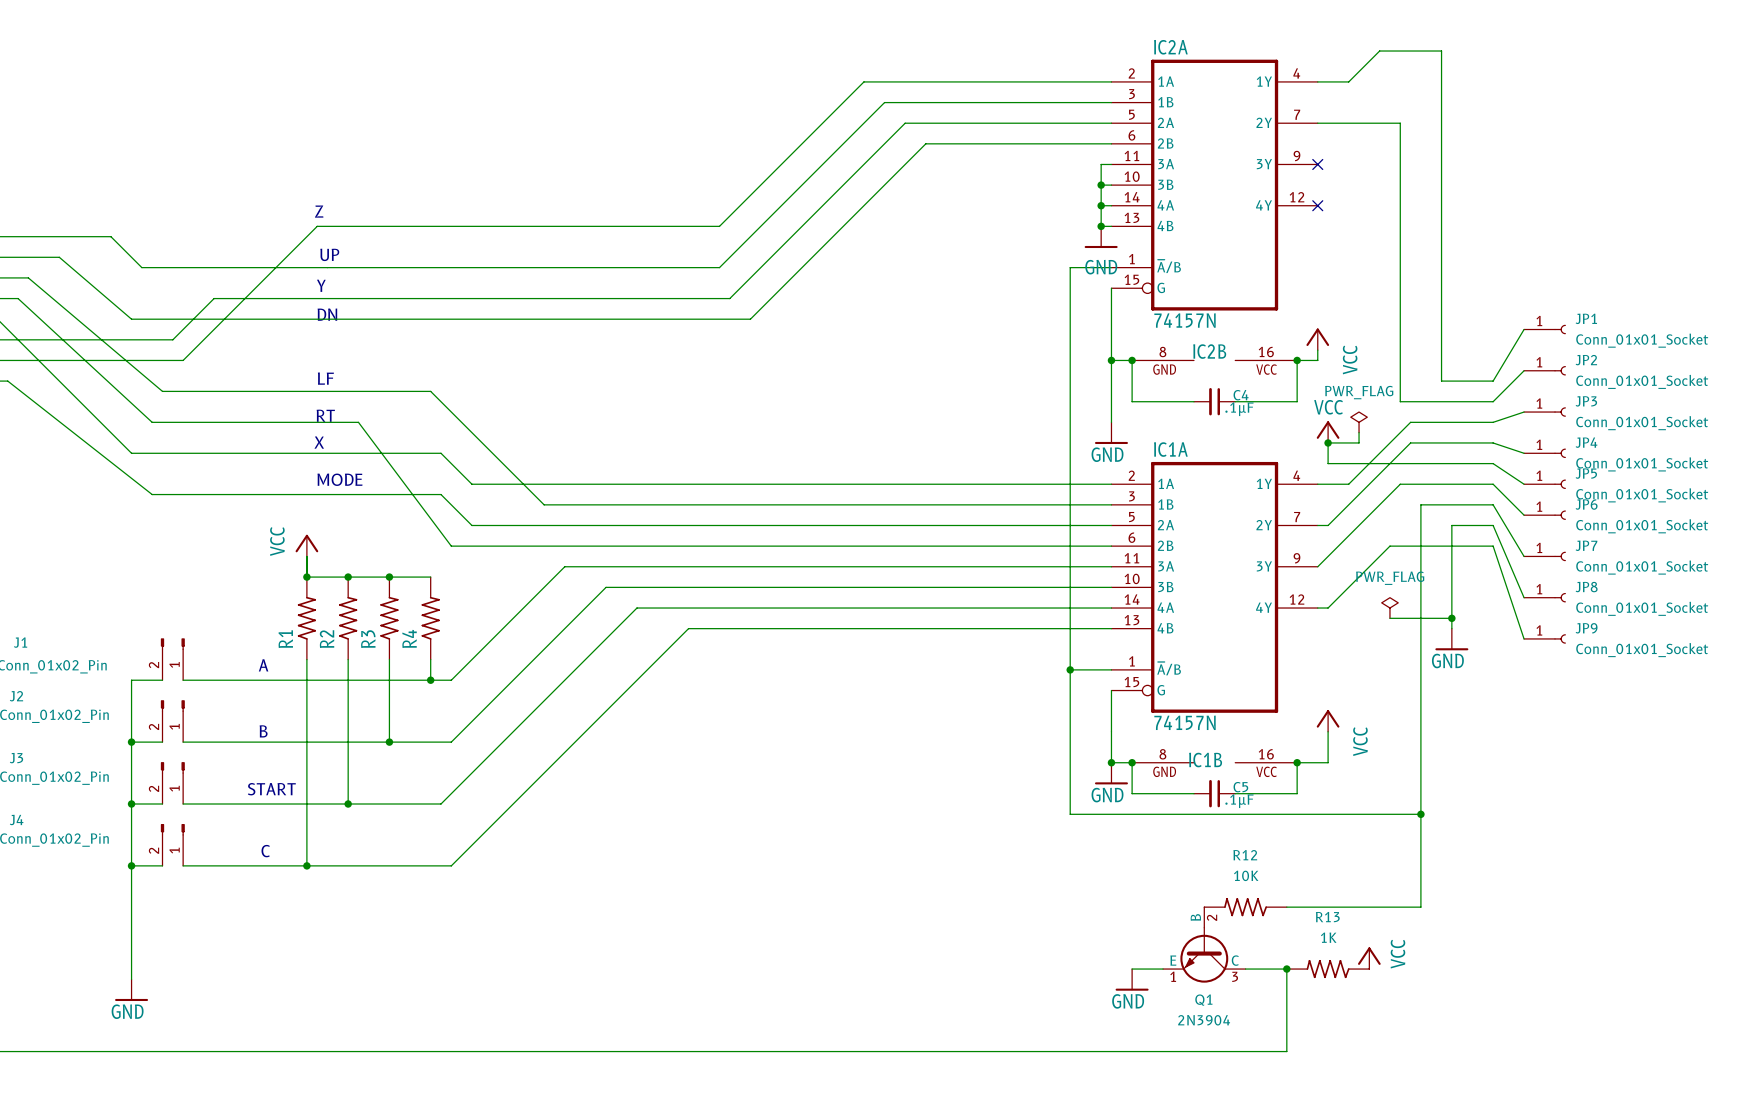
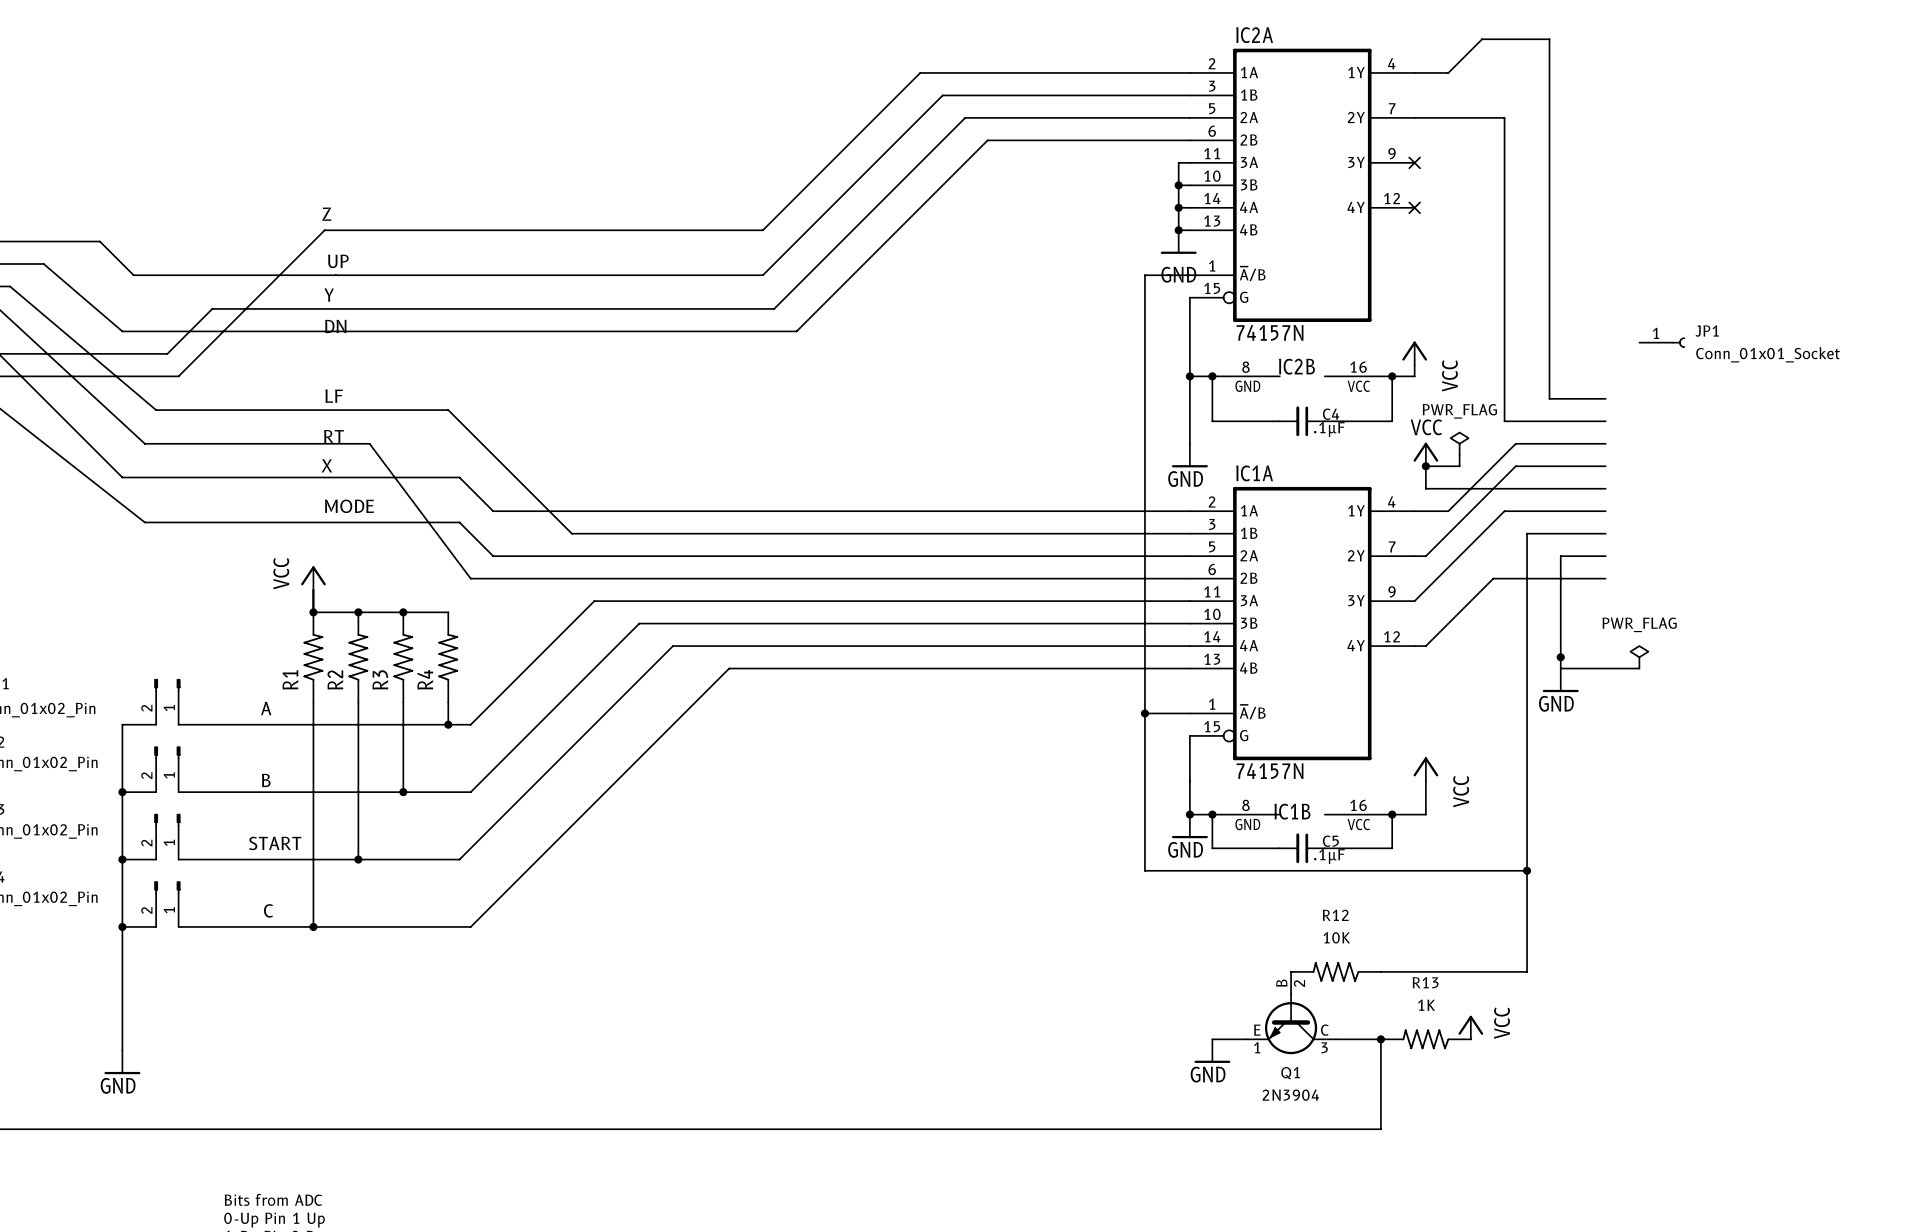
wire: (1524, 329) (1493, 381) -> none
wire: (1524, 370) (1493, 401) -> none
JP2: Conn_01x01_Socket (1545, 370) -> none
wire: (1524, 412) (1493, 422) -> none
JP3: Conn_01x01_Socket (1545, 412) -> none
wire: (1493, 442) (1524, 453) -> none
JP4: Conn_01x01_Socket (1545, 453) -> none
wire: (1493, 463) (1524, 484) -> none
wire: (1493, 484) (1524, 515) -> none
JP5: Conn_01x01_Socket (1545, 484) -> none
wire: (1493, 504) (1524, 556) -> none
JP6: Conn_01x01_Socket (1545, 515) -> none
wire: (1493, 525) (1524, 597) -> none
wire: (1493, 546) (1524, 638) -> none
JP7: Conn_01x01_Socket (1545, 556) -> none
JP8: Conn_01x01_Socket (1545, 597) -> none
power symbol position: PWR_FLAG (1389, 608) -> PWR_FLAG (1639, 657)
wire: (1389, 618) (1451, 618) -> none
wire: none -> (1560, 668) (1639, 668)
JP9: Conn_01x01_Socket (1545, 638) -> none

